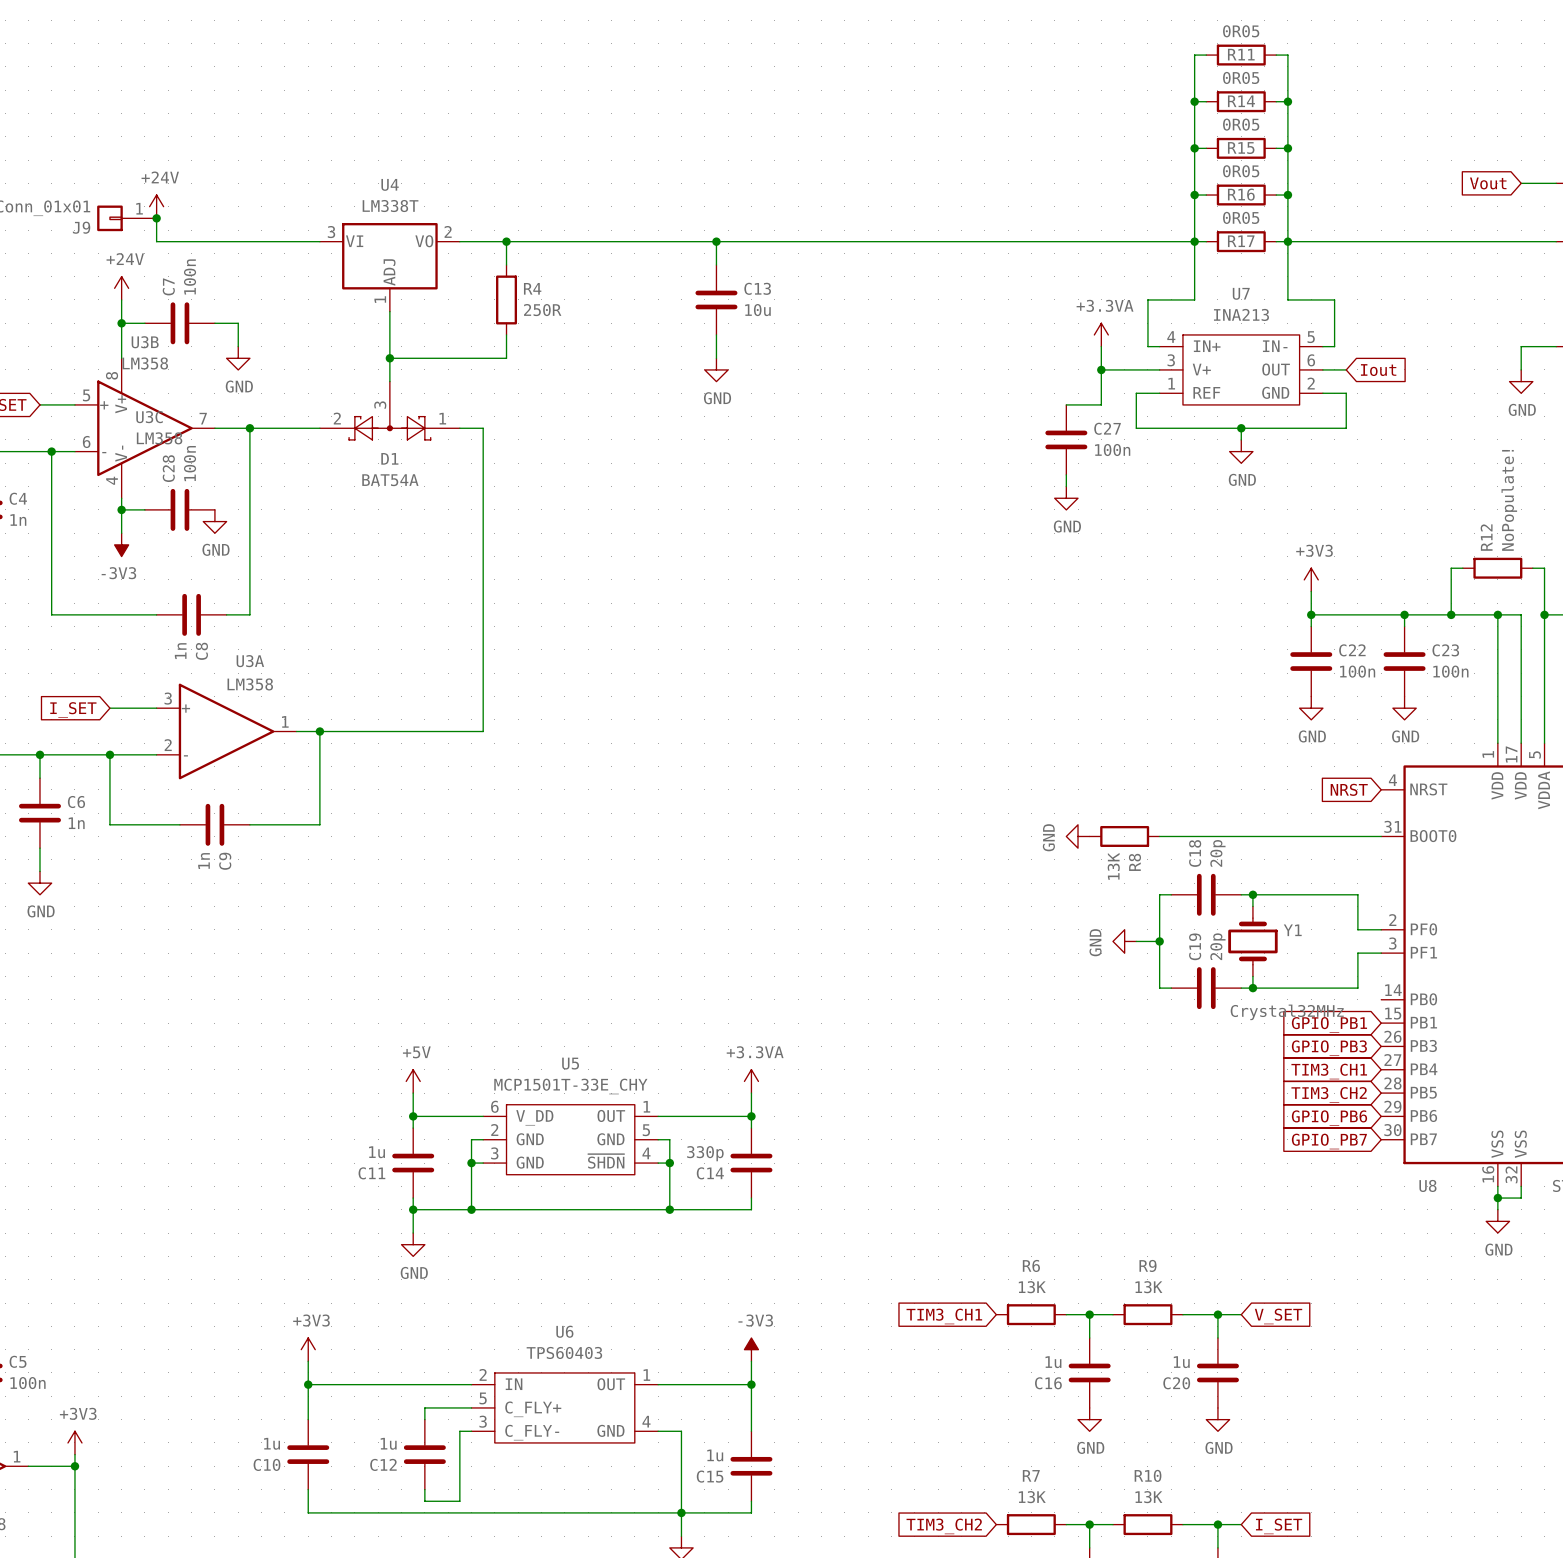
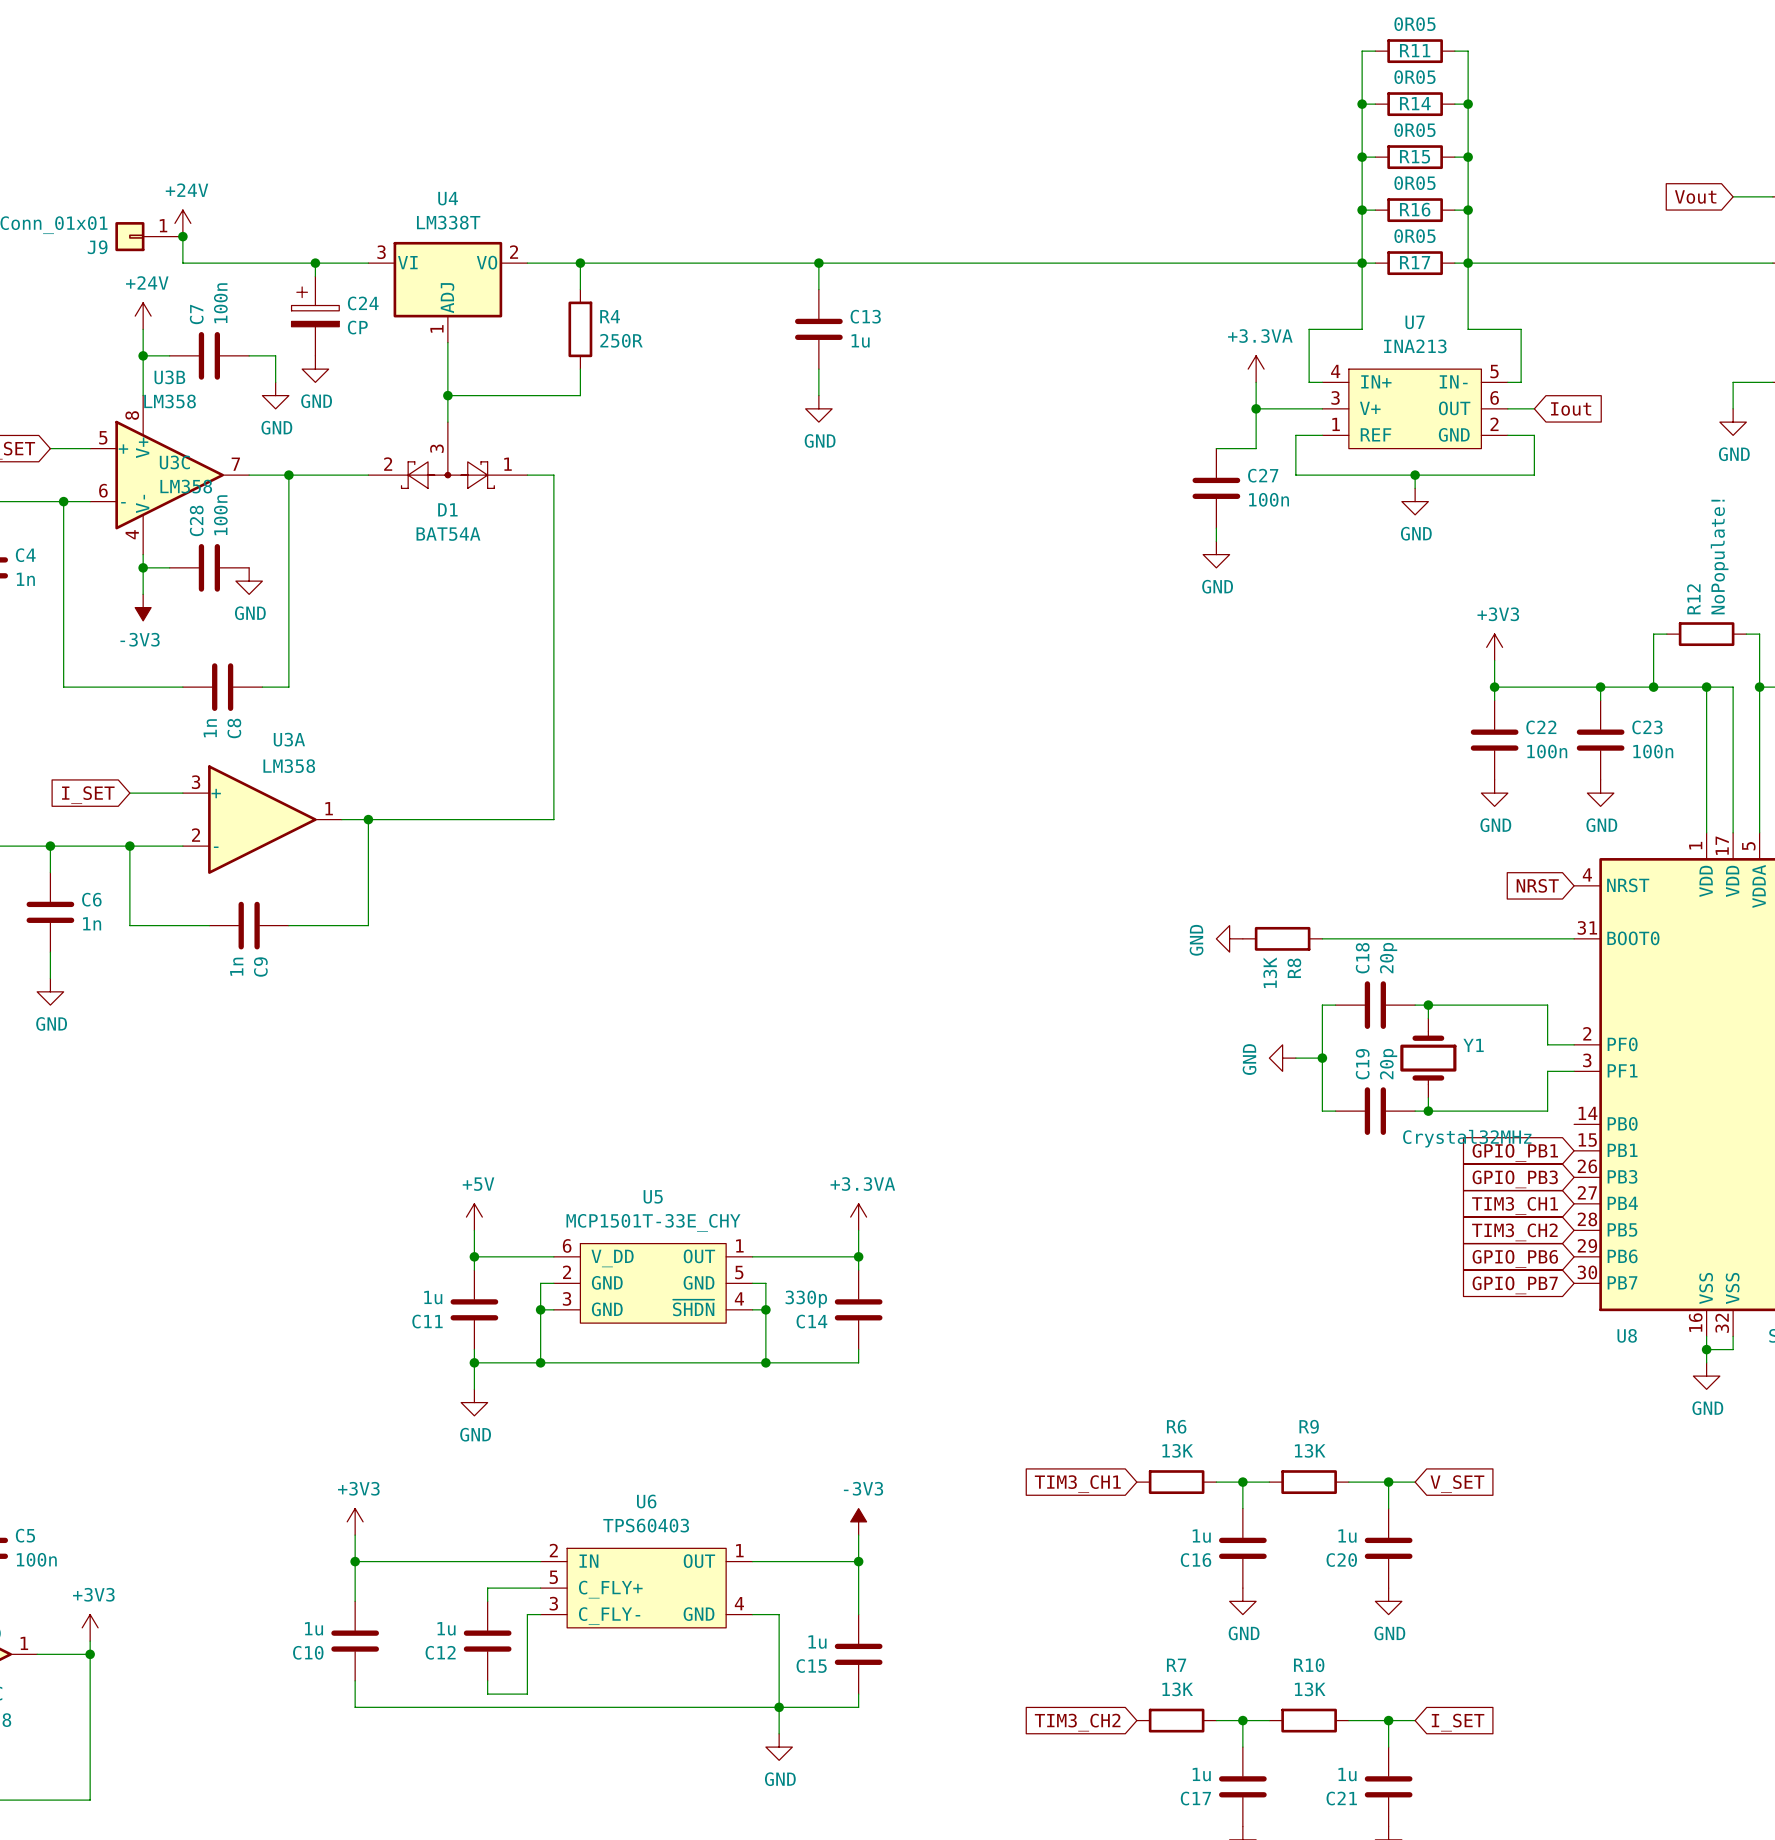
wire: none -> (315, 263) (315, 276)
junction: none -> (315, 263)
C24: none -> CP (315, 316)
C13 value: 10u (757, 310) -> 1u (860, 340)
power symbol: none -> GND (315, 369)

